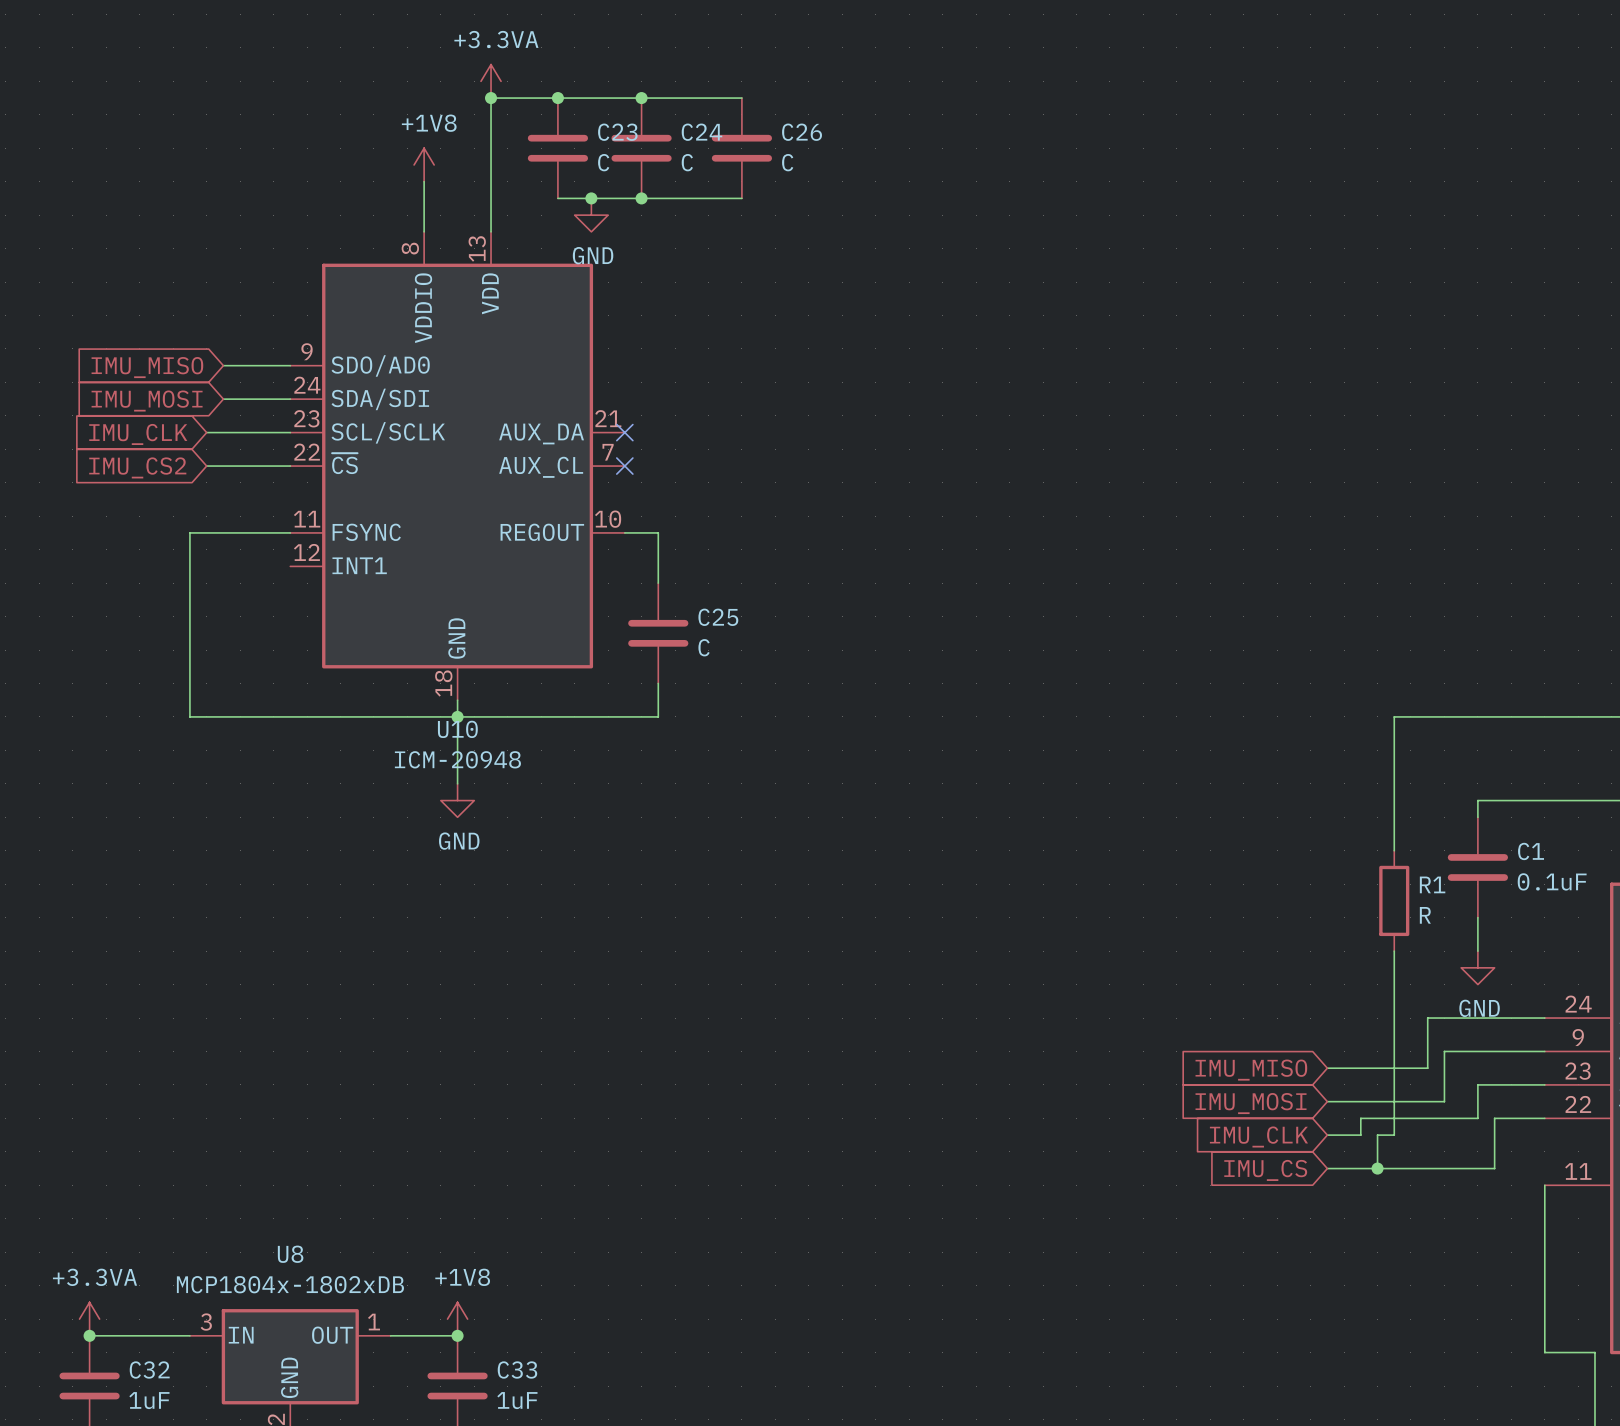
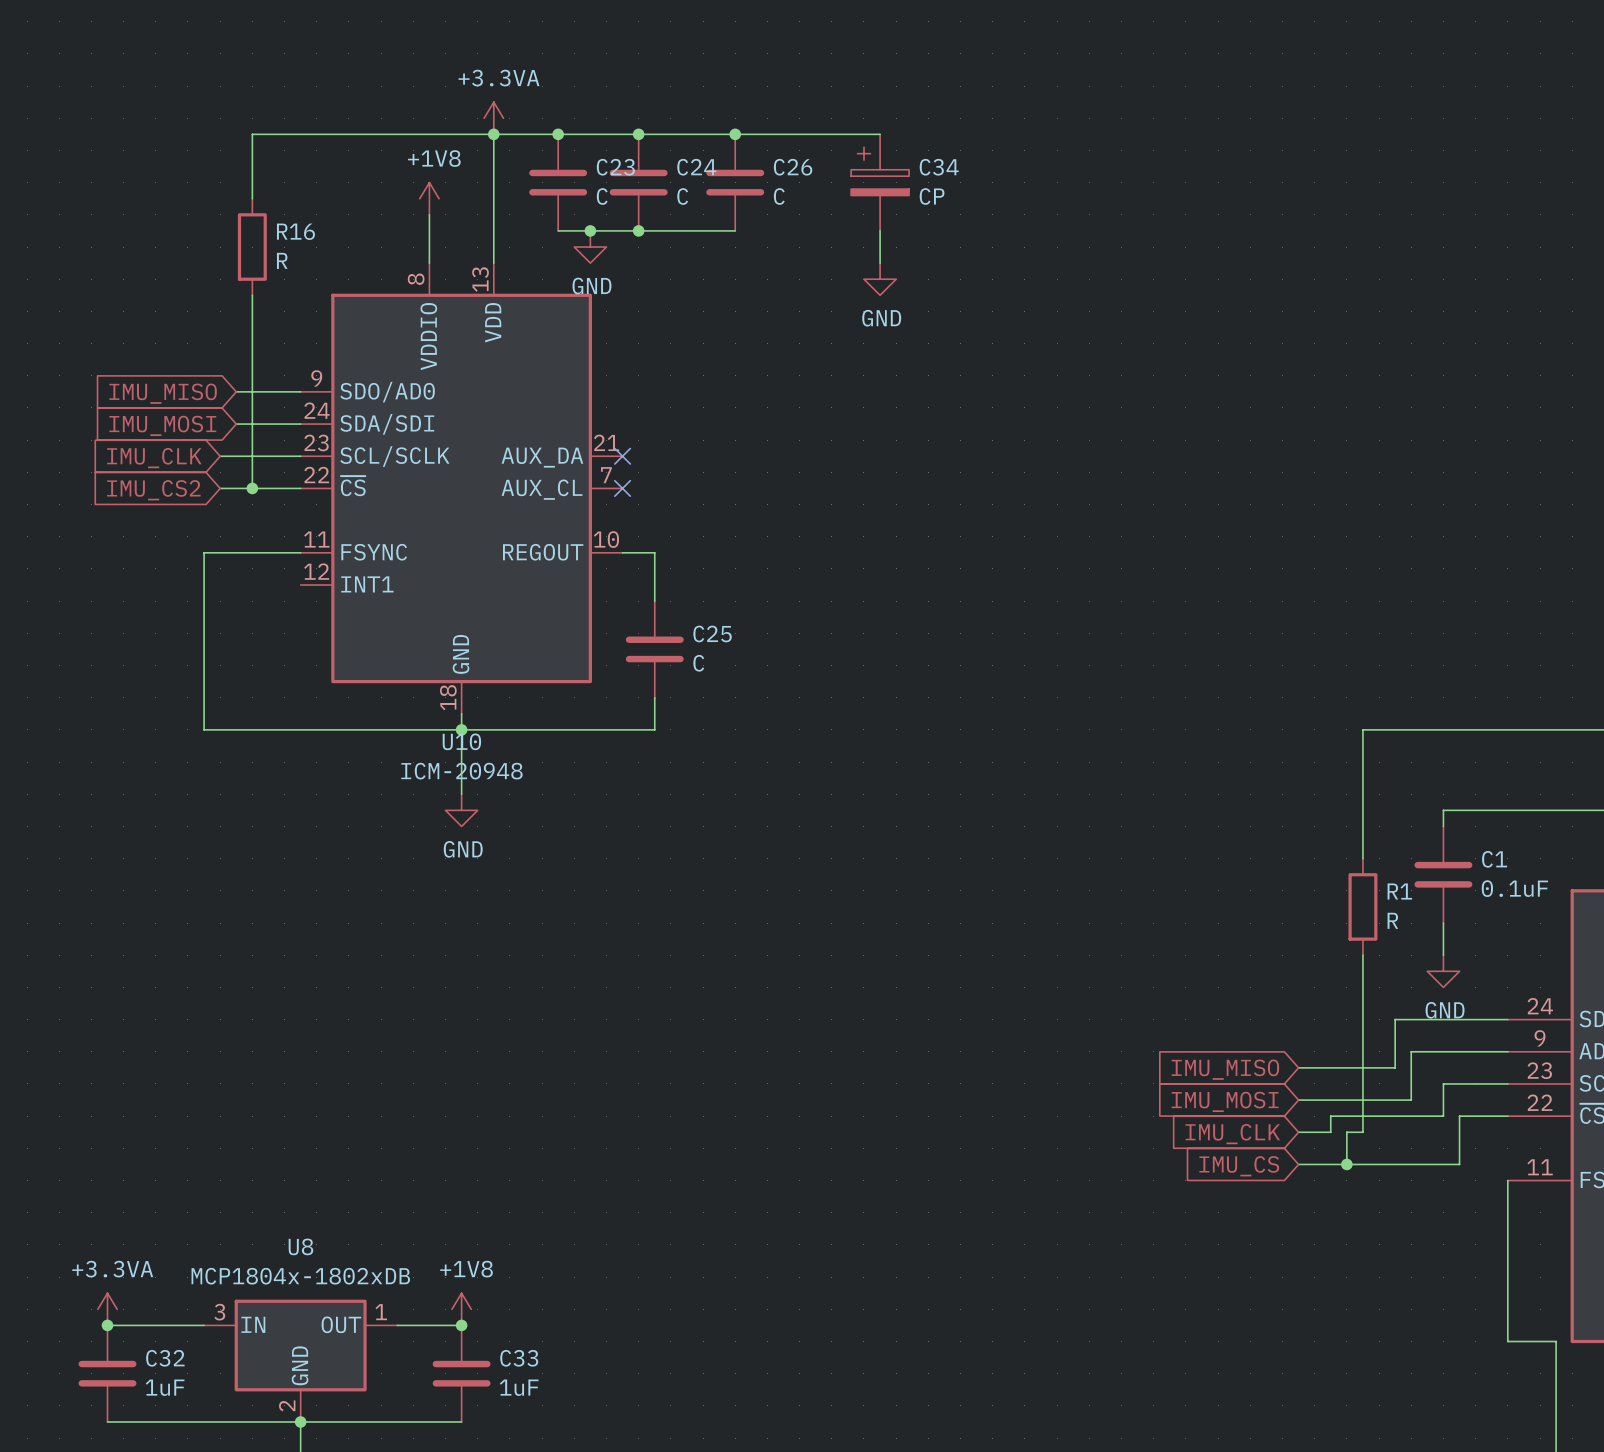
wire: none -> (493, 134) (252, 134) (252, 198)
wire: none -> (735, 134) (880, 134)
junction: none -> (735, 134)
C34: none -> CP (880, 182)
wire: none -> (880, 230) (880, 263)
R16: none -> R (252, 247)
power symbol: none -> GND (880, 279)
wire: none -> (252, 295) (252, 488)
junction: none -> (252, 488)

